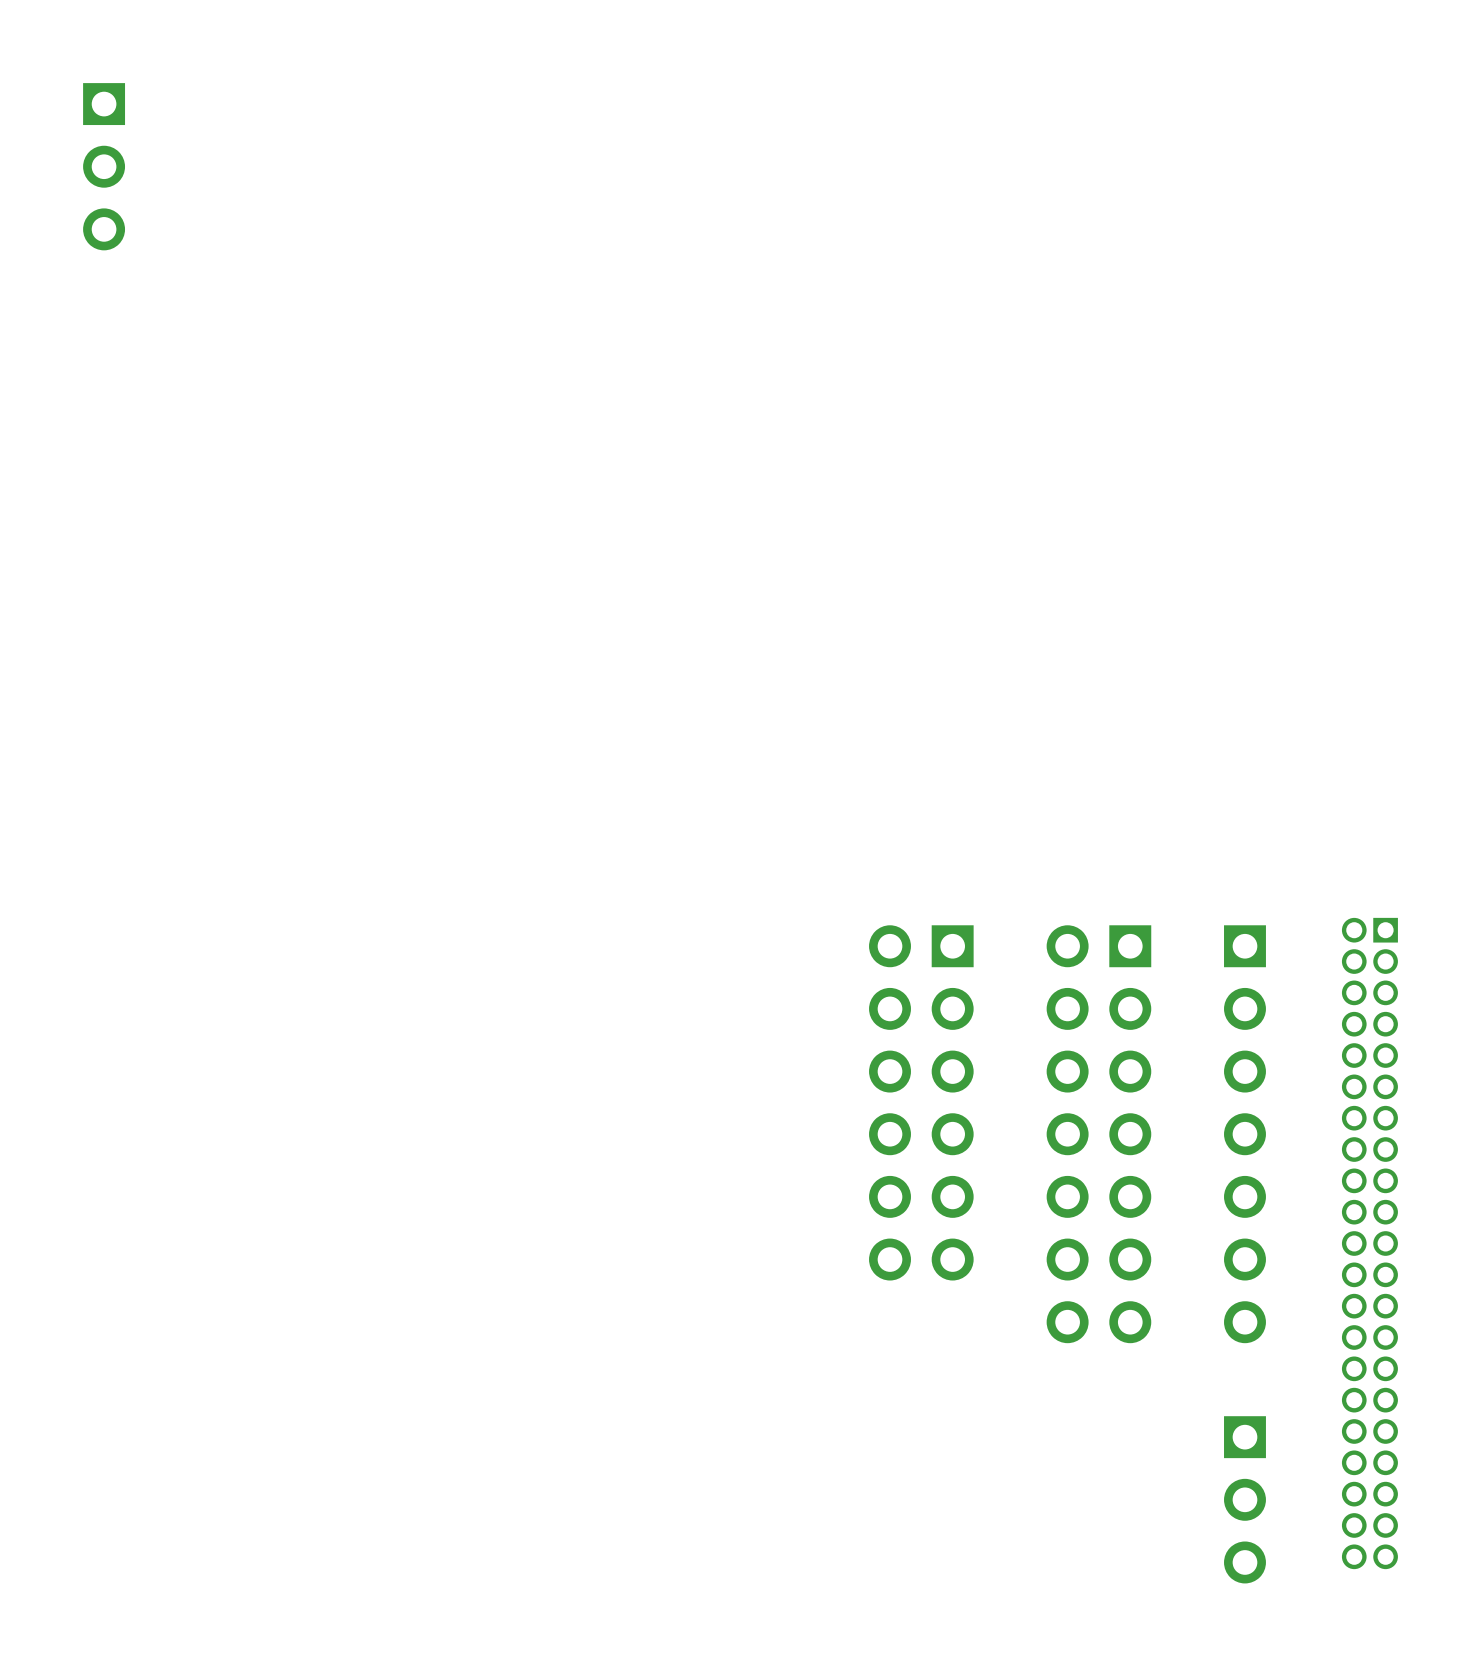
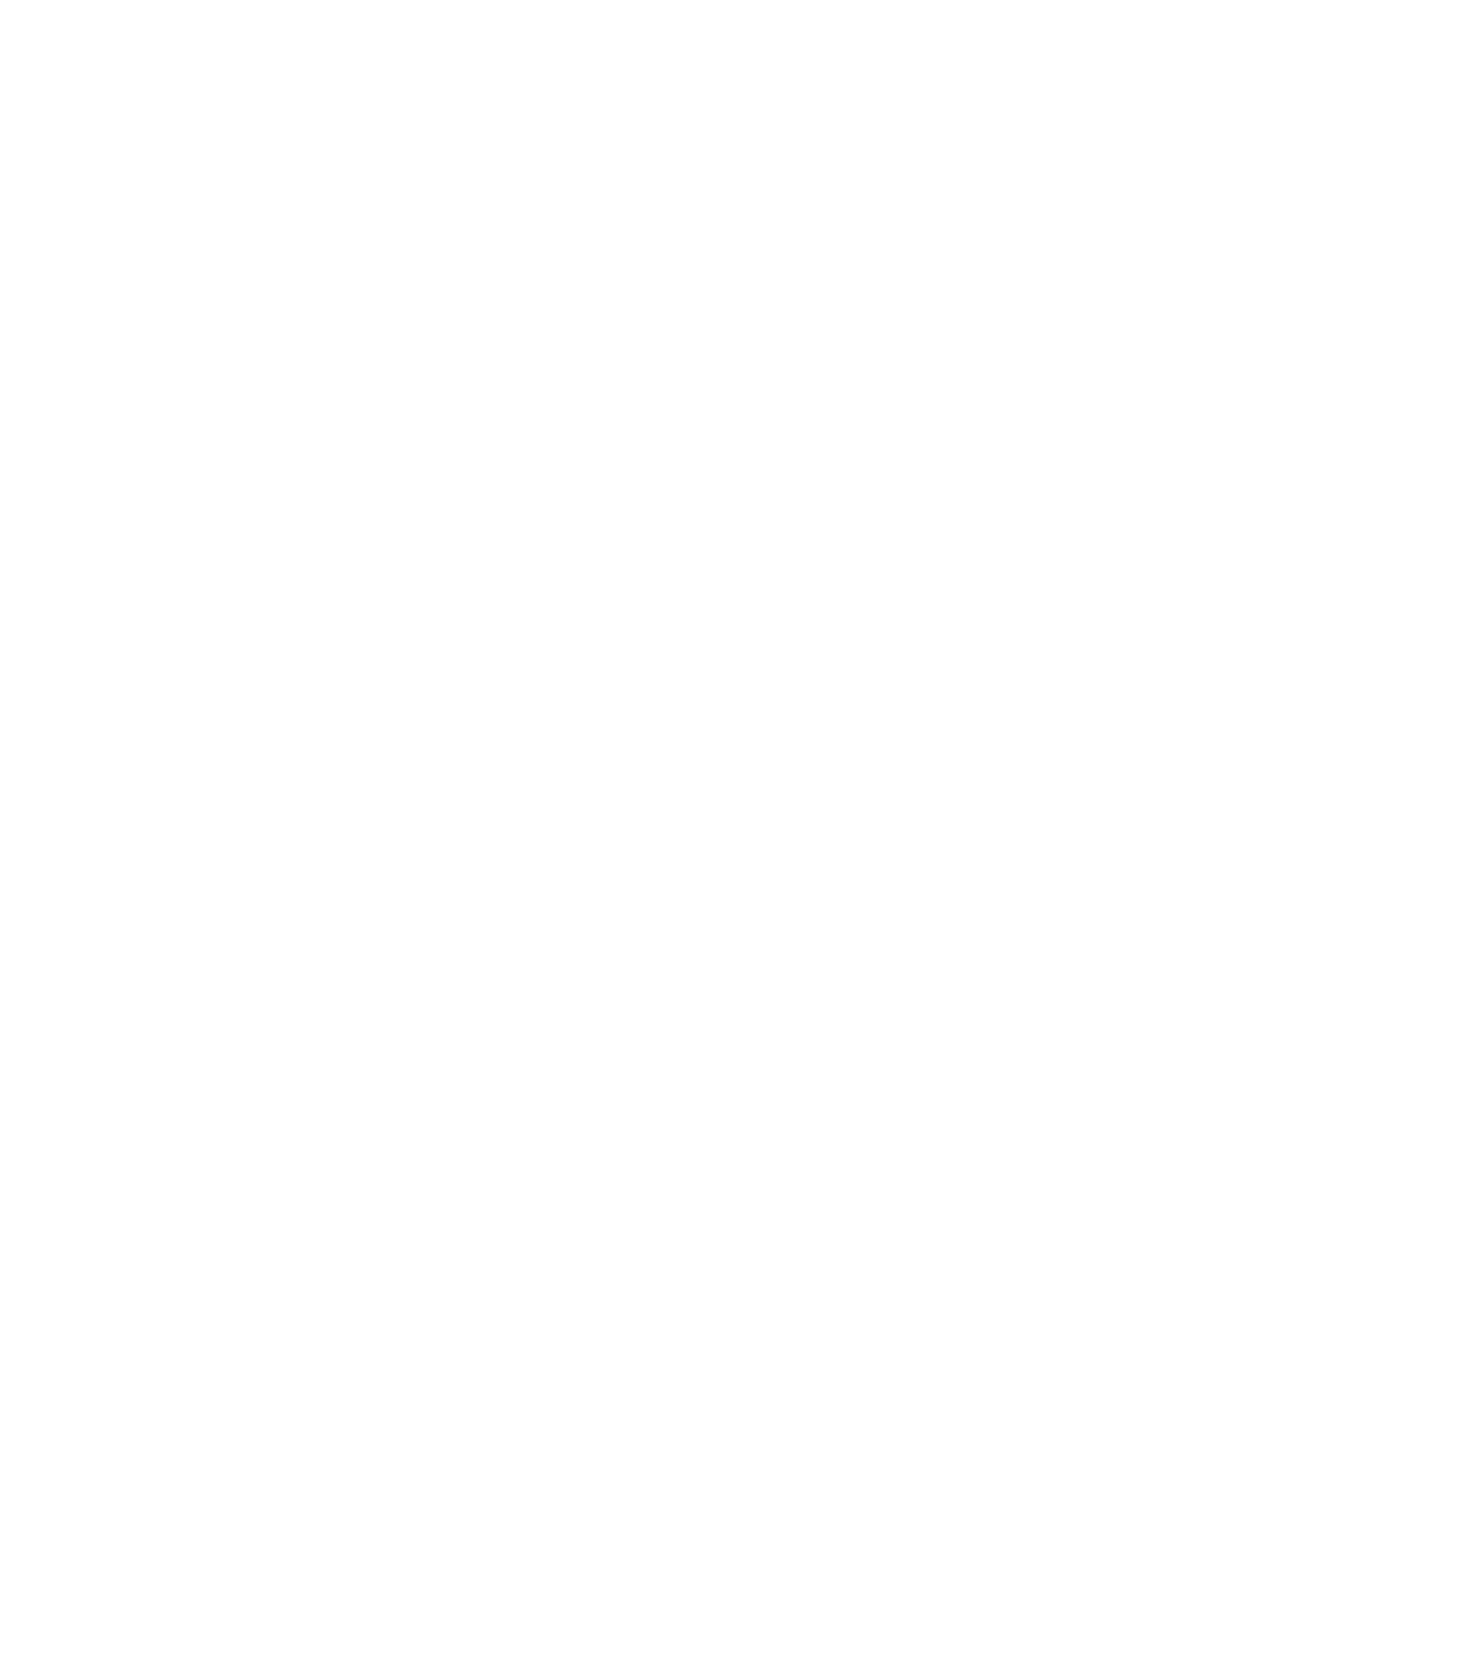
part: (104, 166) -> none
part: (921, 1102) -> none
part: (1098, 1134) -> none
part: (1244, 1134) -> none
part: (1369, 1243) -> none
part: (1244, 1499) -> none

